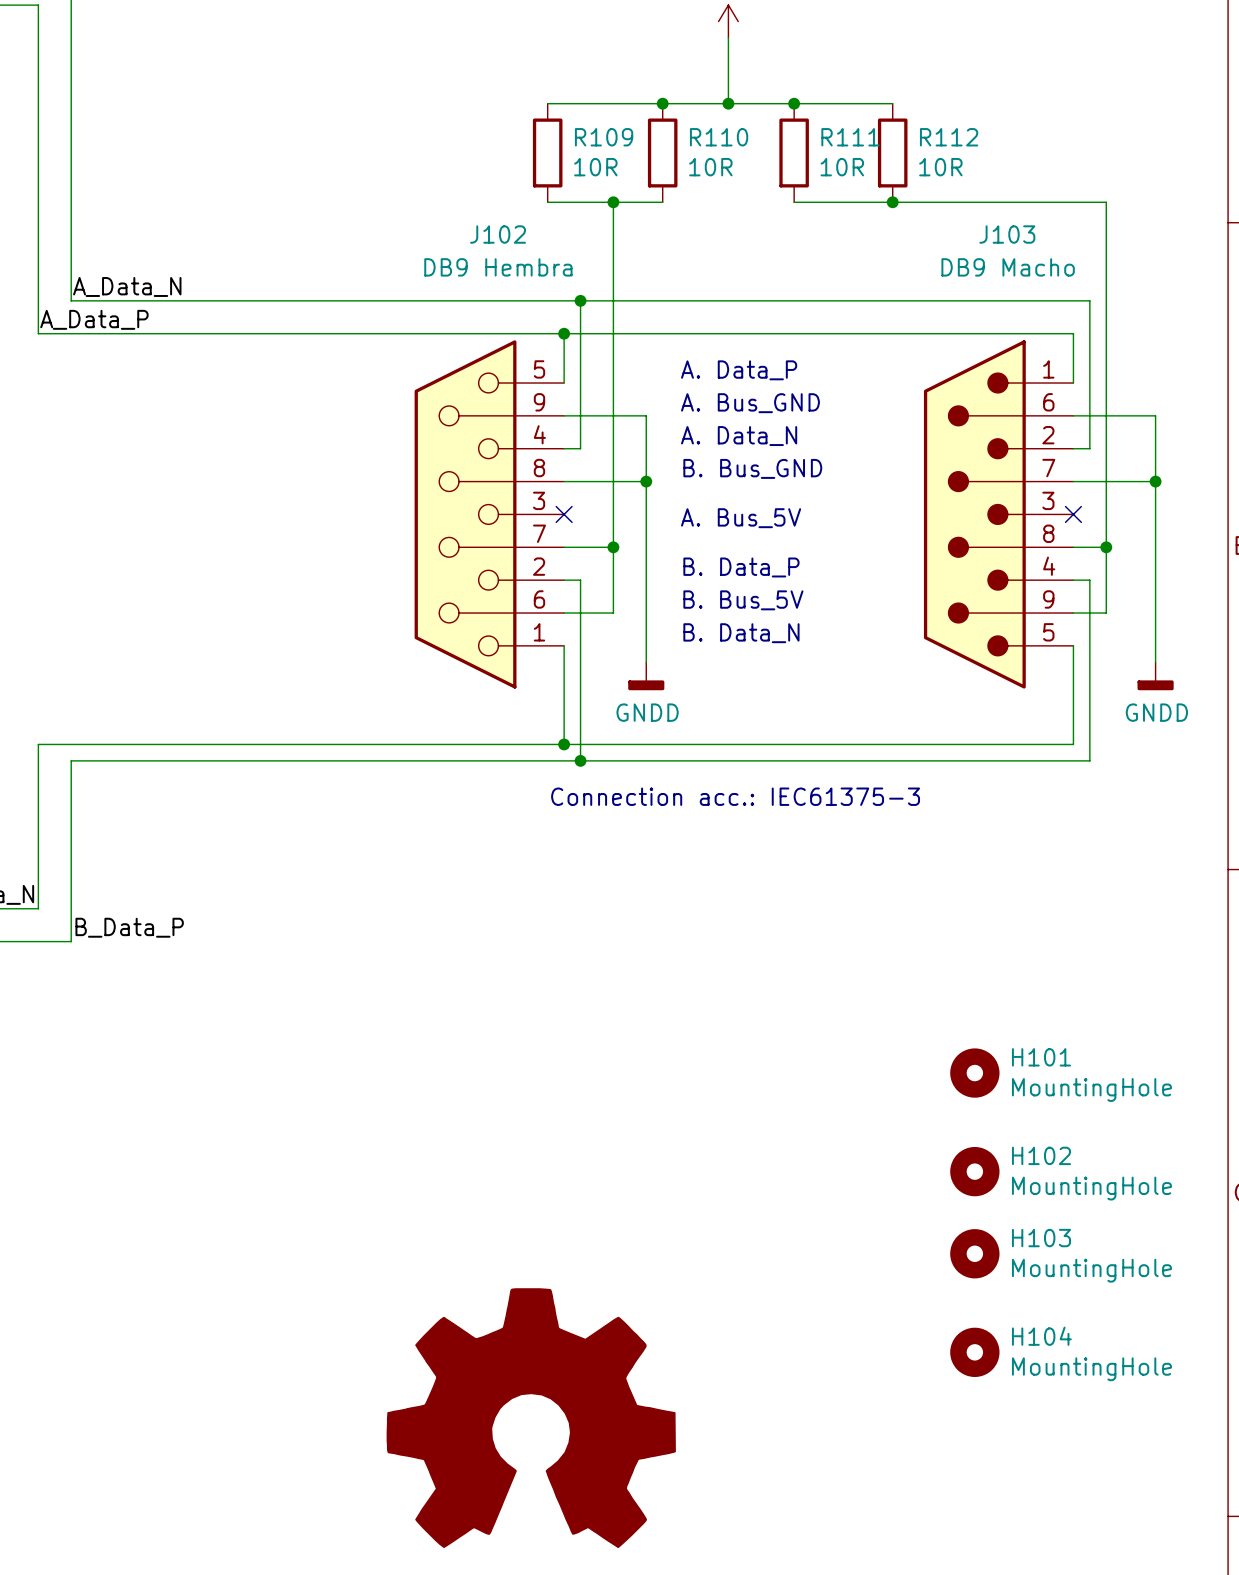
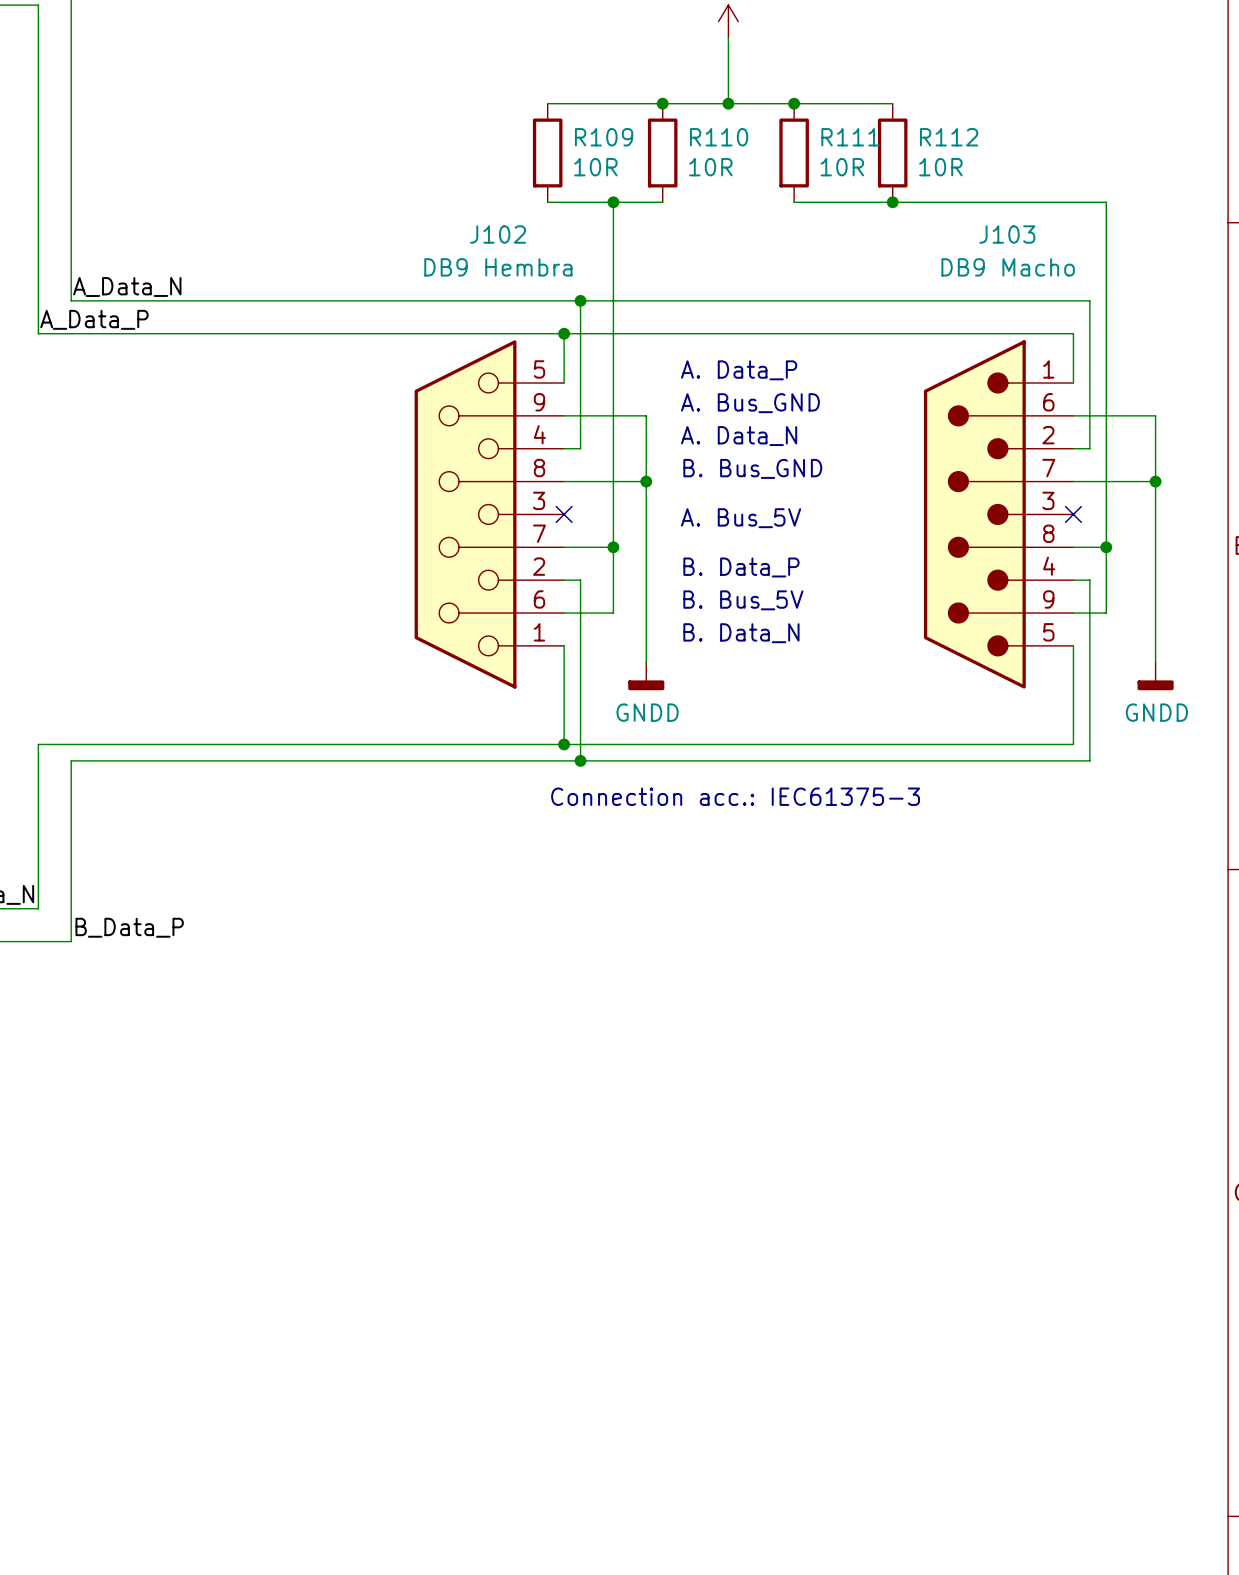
H101: MountingHole (974, 1073) -> none
H102: MountingHole (974, 1171) -> none
H103: MountingHole (974, 1253) -> none
H104: MountingHole (974, 1352) -> none
power symbol: (531, 1418) -> none

